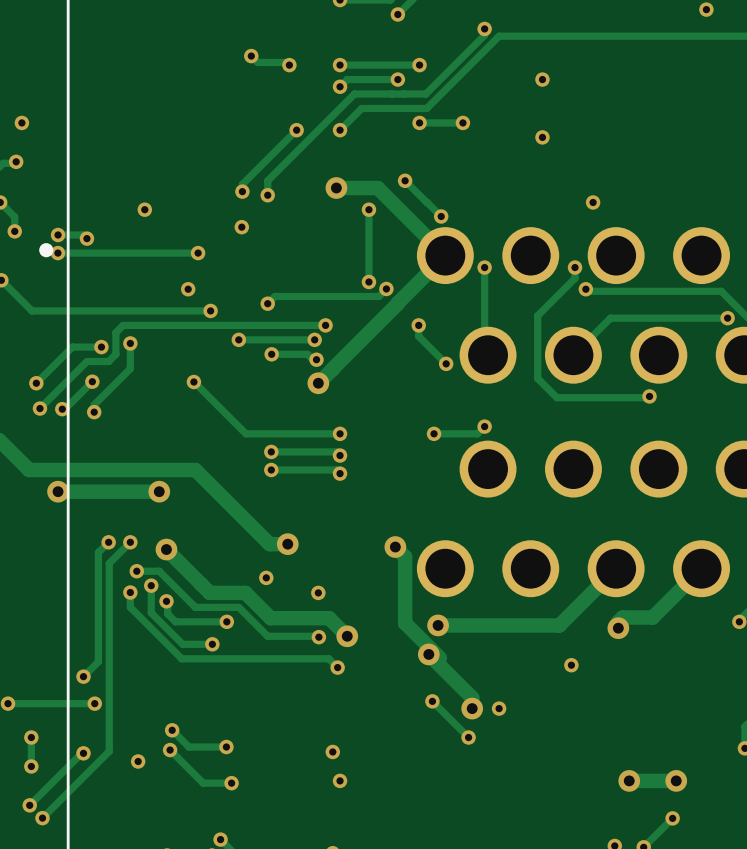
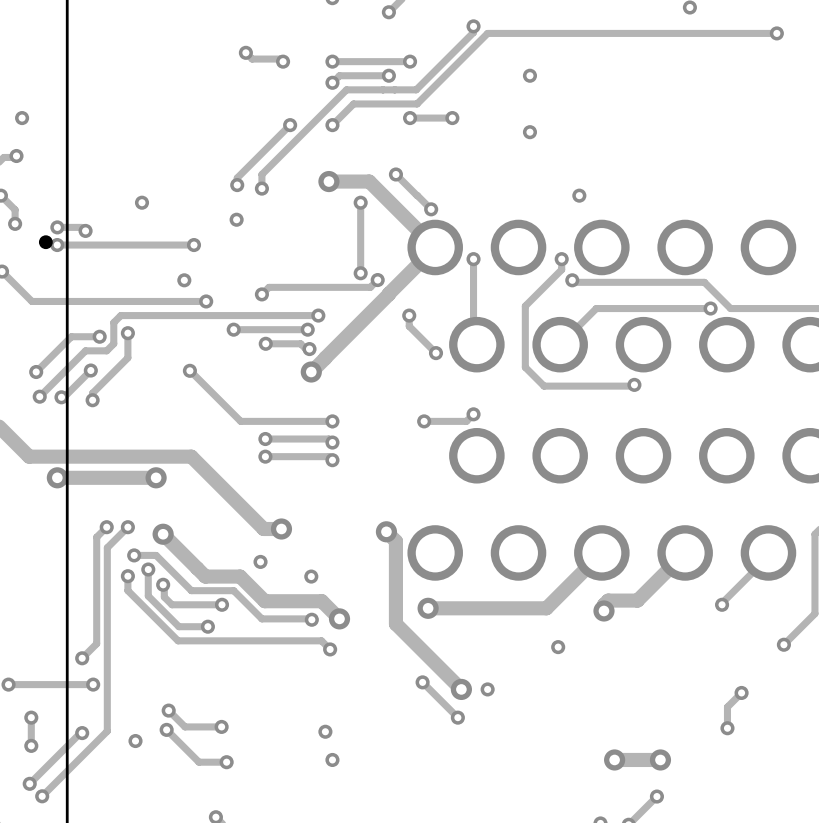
track: (405, 623) (439, 657) -> none
track: (428, 654) (472, 697) (472, 708) -> (395, 606) (395, 623) (461, 689)
via: (428, 654) -> none

